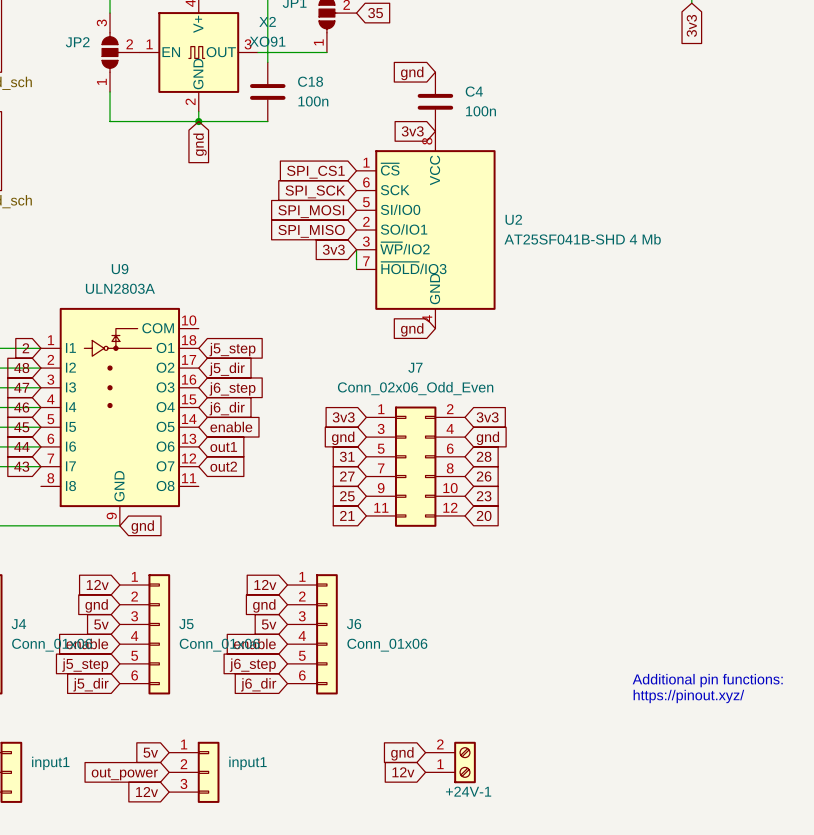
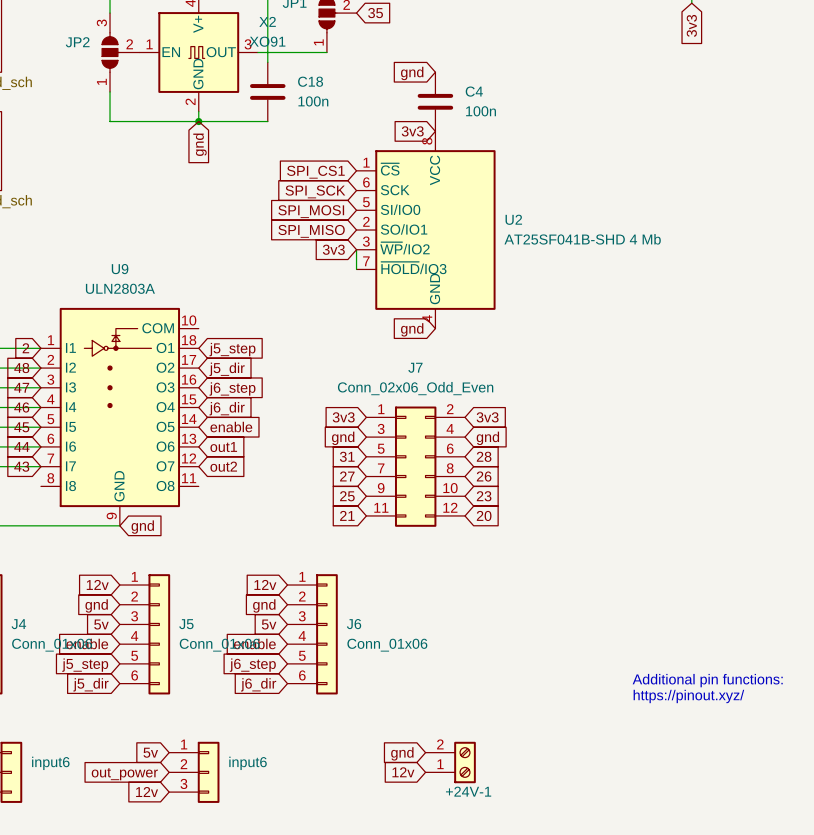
input1 name: input1 (50, 763) -> input6 (50, 763)
input1 name: input1 (247, 763) -> input6 (248, 763)

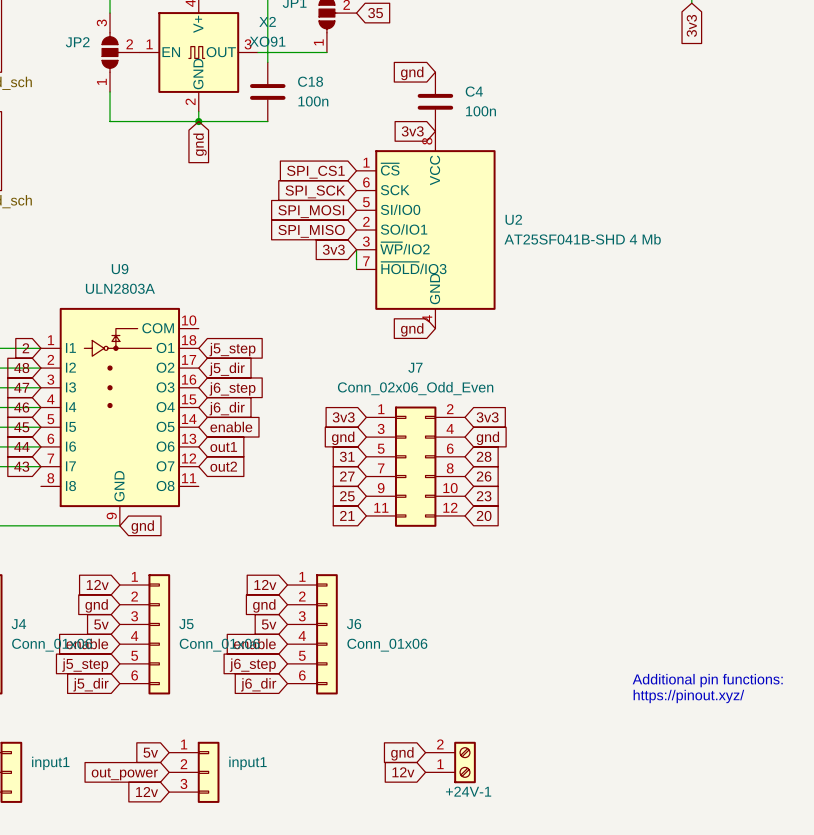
input6 name: input6 (50, 763) -> input1 (50, 763)
input6 name: input6 (248, 763) -> input1 (247, 763)

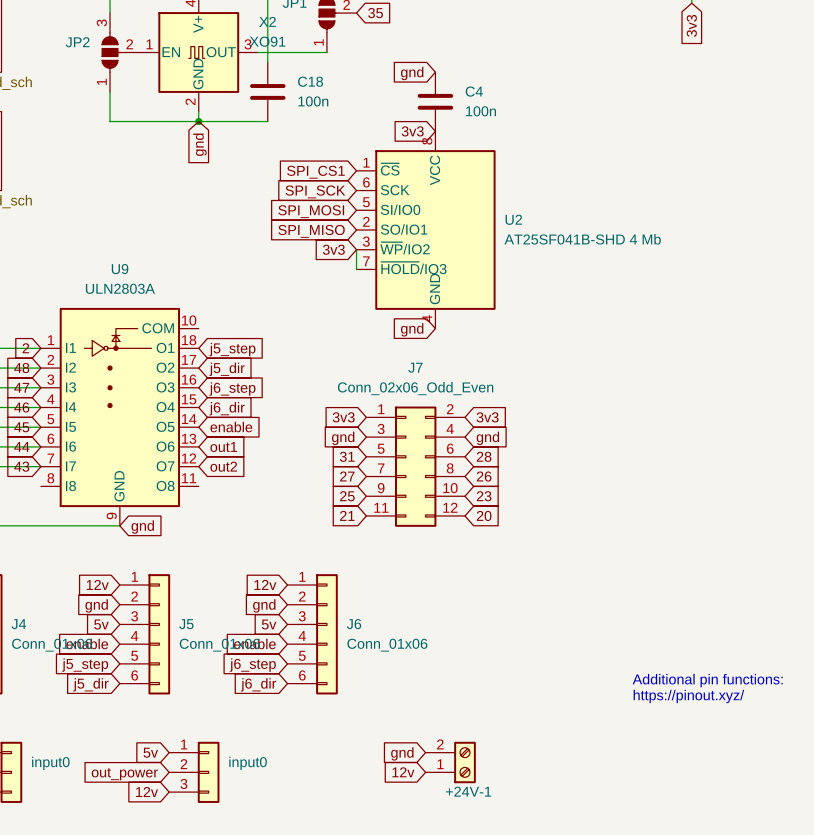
input1 name: input1 (50, 763) -> input0 (50, 763)
input1 name: input1 (247, 763) -> input0 (248, 763)

